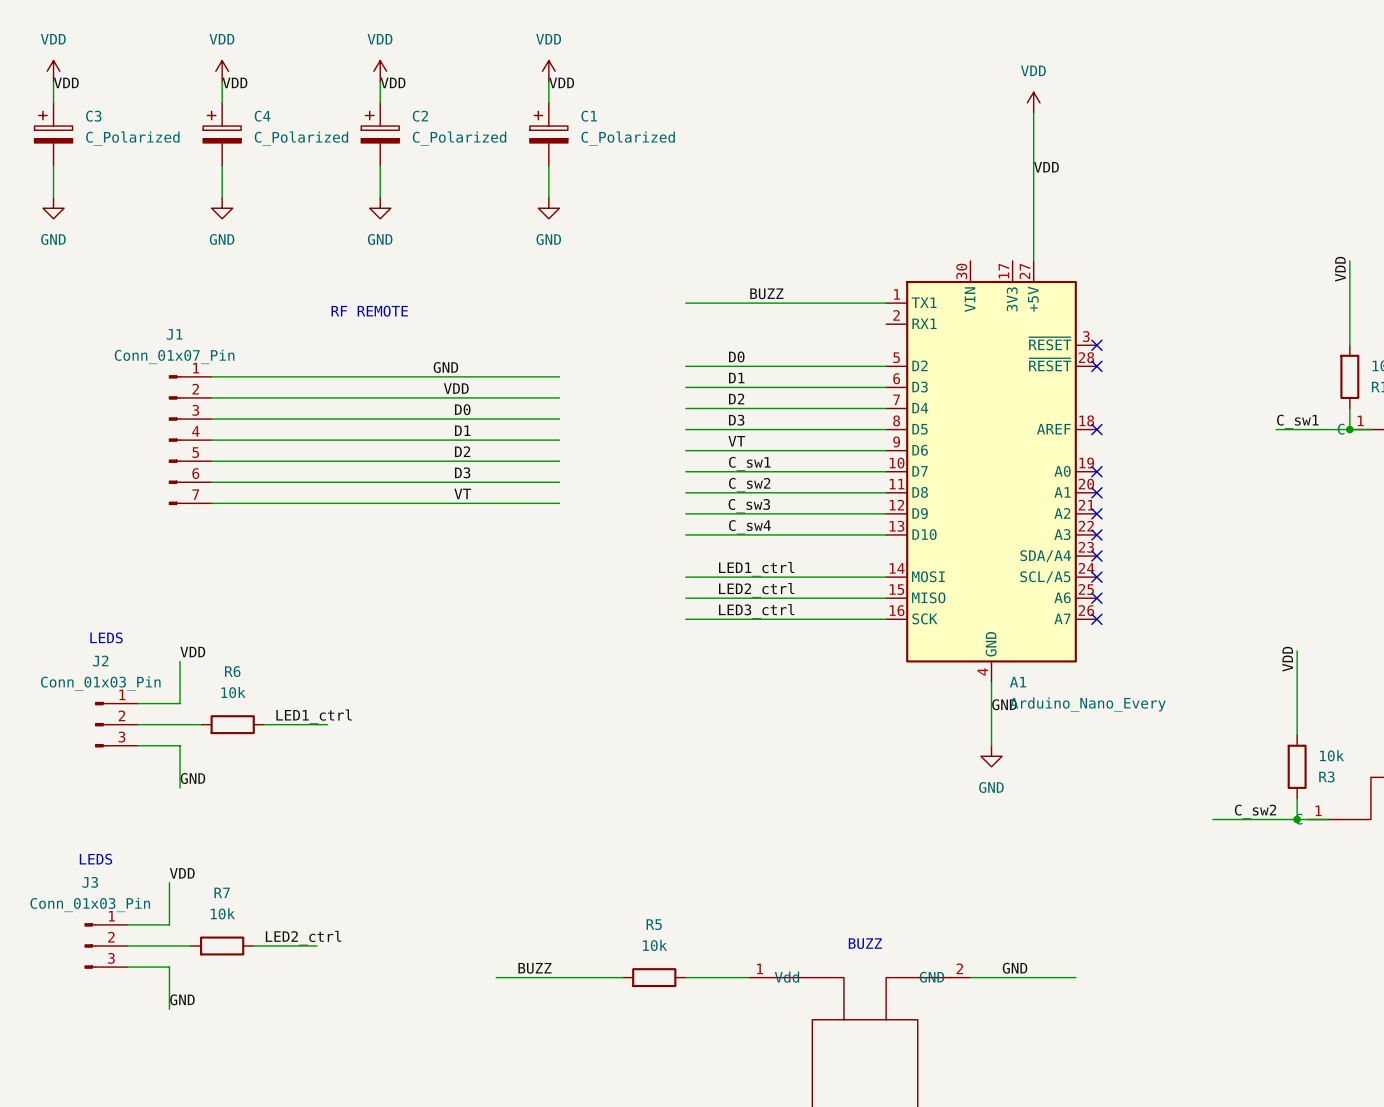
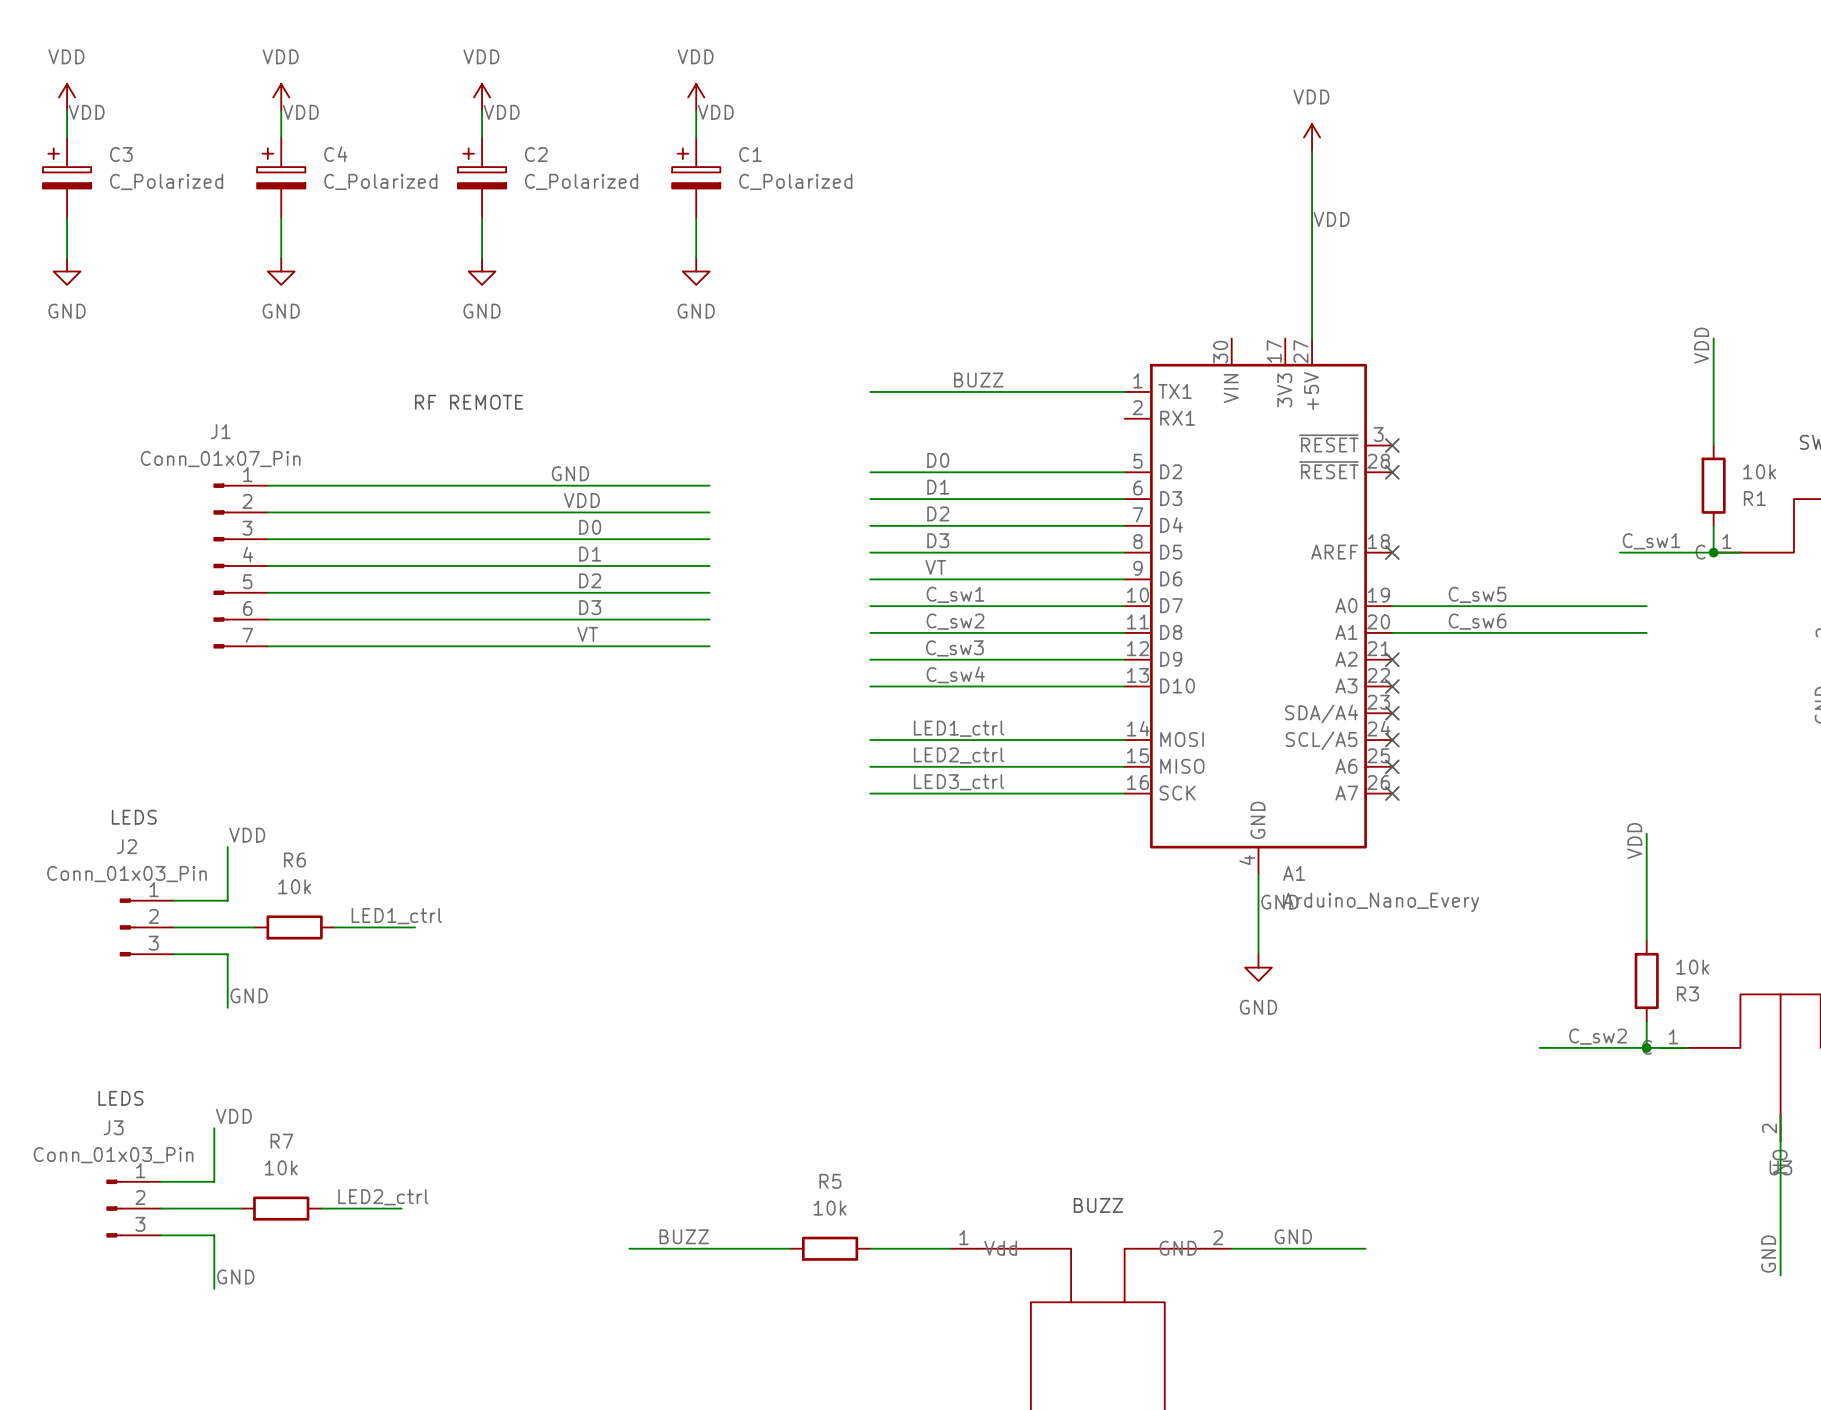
label: none -> C_sw5 (1477, 594)
wire: none -> (1392, 606) (1646, 606)
no-connect mark: (1096, 471) -> none
label: none -> C_sw6 (1477, 621)
wire: none -> (1392, 632) (1646, 632)
no-connect mark: (1096, 492) -> none

